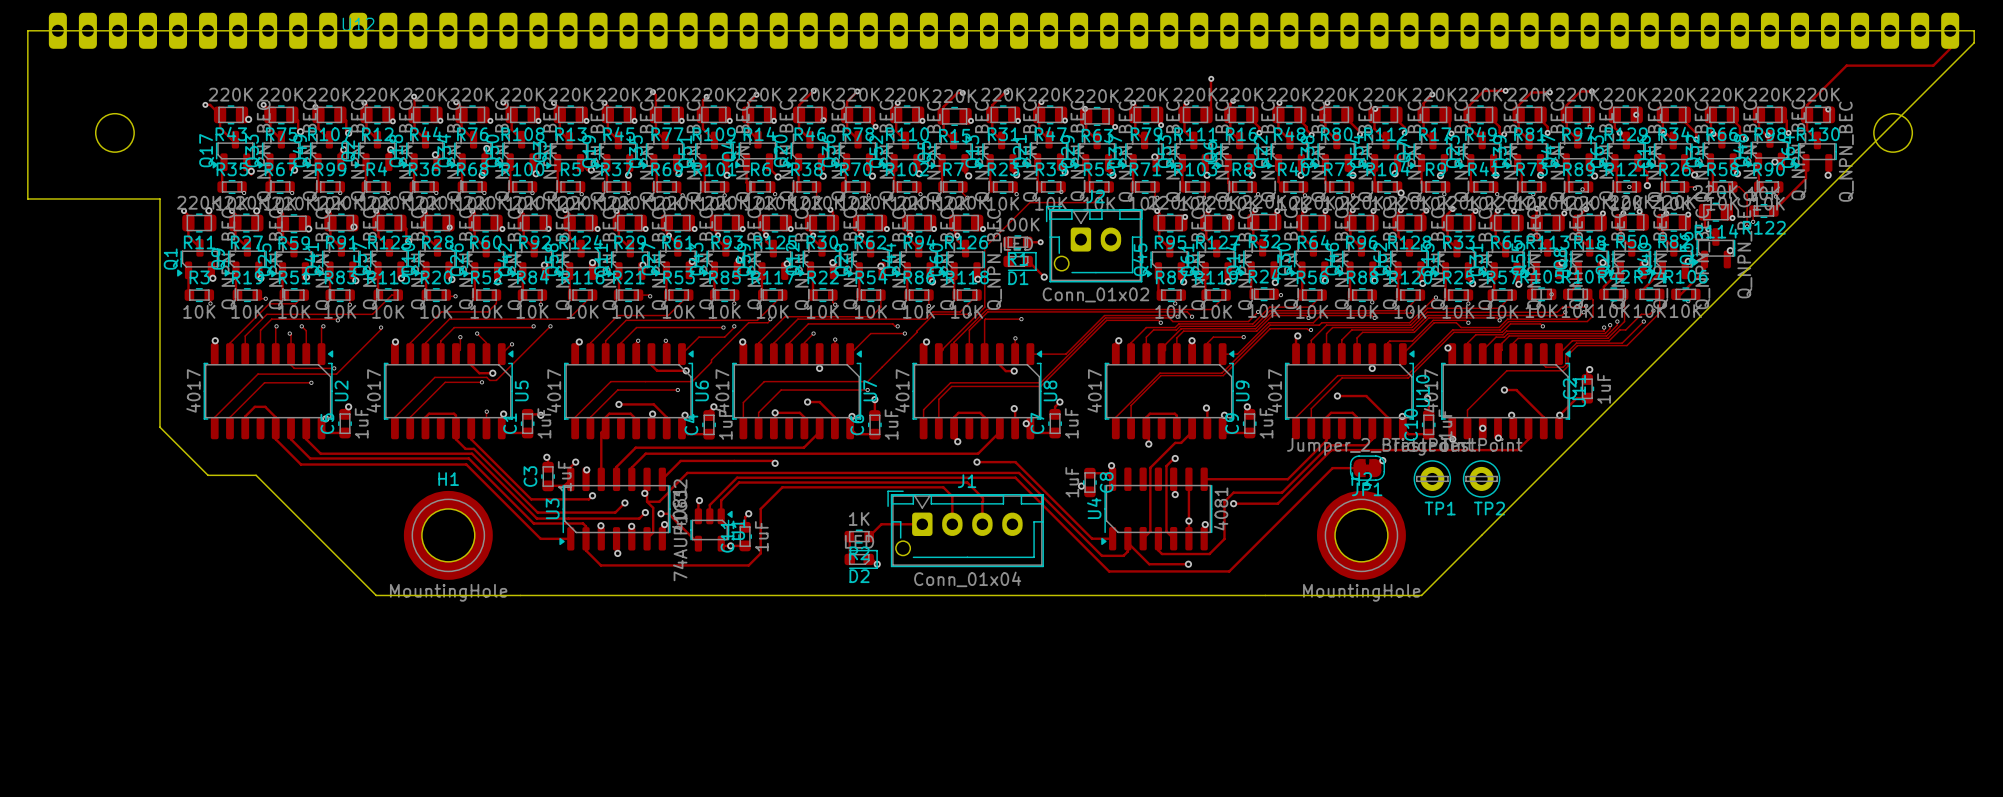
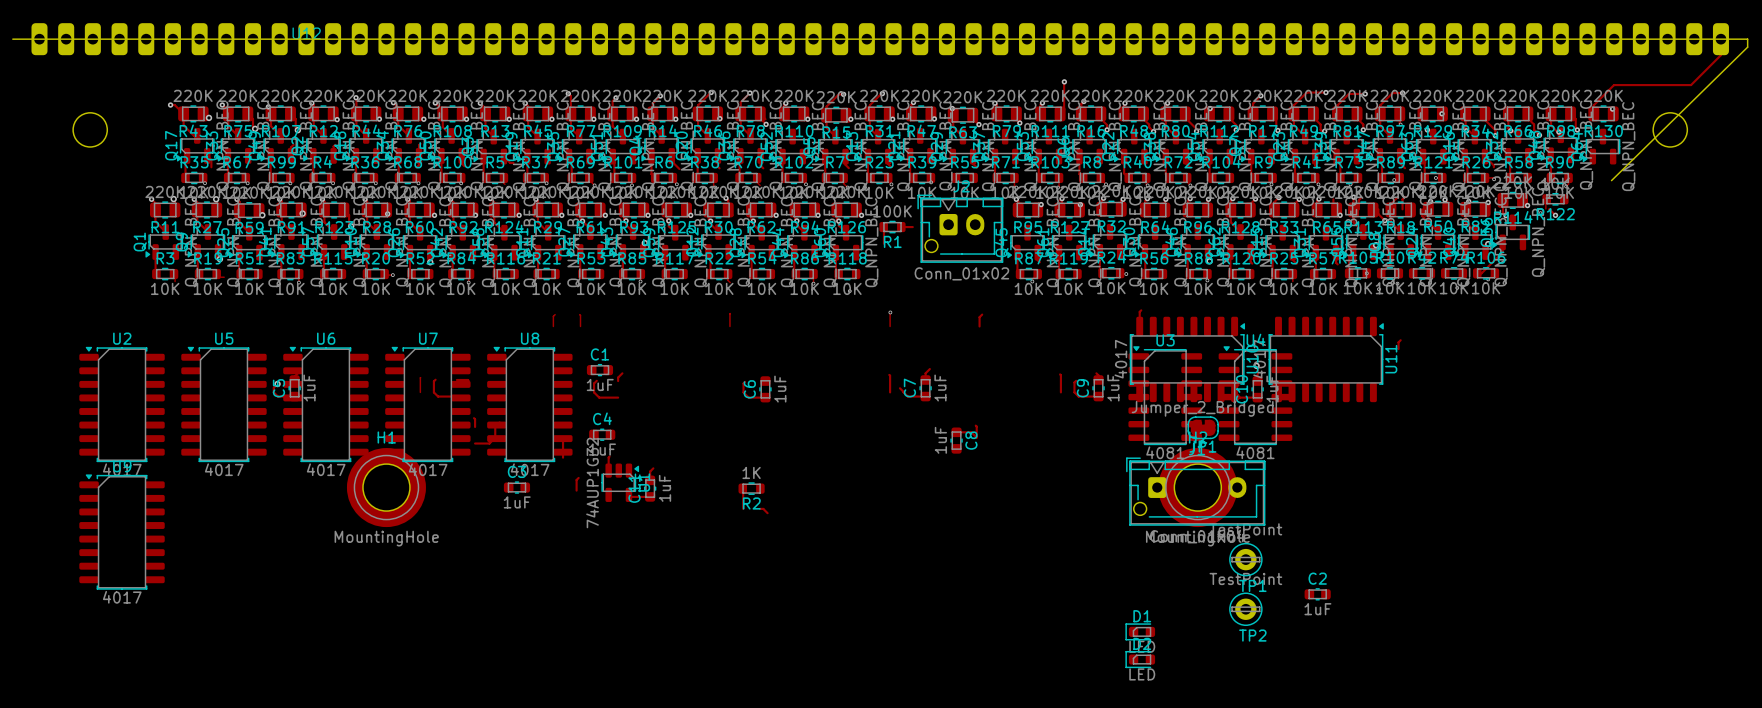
board edge: (27, 30) (27, 198) (159, 198) (159, 427) (208, 475) (256, 475) (376, 595) (1421, 595) (1974, 42) (1974, 30) -> (1611, 180) (1747, 47) (1747, 39) (1742, 39)
track: (1933, 65) (1846, 65) (1829, 82) -> (1706, 70) (1691, 85) (1614, 85)
track: (896, 114) (896, 131) (905, 140) -> none
track: (1039, 114) (1039, 129) (1049, 139) -> none
track: (1135, 114) (1135, 131) (1144, 140) -> none
track: (1184, 114) (1184, 131) (1193, 140) -> none
track: (1230, 114) (1230, 131) (1239, 140) -> none
track: (1278, 114) (1278, 128) (1289, 140) -> none
track: (1374, 114) (1374, 128) (1386, 140) -> none
track: (1423, 114) (1423, 131) (1432, 140) -> none
track: (1518, 114) (1518, 130) (1529, 140) -> none
track: (1614, 114) (1614, 127) (1619, 132) -> none
track: (1807, 114) (1807, 130) (1817, 140) -> none
via: (486, 148) -> none
via: (343, 149) -> none
via: (390, 149) -> none
via: (435, 154) -> none
via: (1154, 156) -> none
via: (1774, 161) -> none
track: (1085, 162) (1089, 166) (1089, 186) -> none
track: (1637, 162) (1647, 172) (1647, 185) -> none
track: (1805, 162) (1805, 178) (1773, 211) -> none
via: (294, 170) -> none
via: (591, 170) -> none
via: (251, 171) -> none
via: (1065, 172) -> none
via: (536, 173) -> none
via: (679, 173) -> none
via: (919, 173) -> none
via: (1395, 173) -> none
via: (1737, 173) -> none
via: (1016, 174) -> none
via: (1694, 174) -> none
via: (482, 175) -> none
via: (628, 175) -> none
via: (727, 175) -> none
via: (968, 175) -> none
via: (1112, 175) -> none
via: (1207, 175) -> none
via: (1252, 175) -> none
via: (1301, 175) -> none
via: (1352, 175) -> none
via: (1440, 175) -> none
via: (1495, 175) -> none
via: (1540, 175) -> none
via: (1828, 175) -> none
via: (778, 176) -> none
via: (823, 176) -> none
via: (872, 176) -> none
via: (1594, 176) -> none
via: (1647, 185) -> none
track: (1109, 186) (1093, 202) (1029, 202) (984, 247) (984, 307) (938, 354) -> none
track: (1732, 186) (1739, 186) (1747, 194) (1747, 226) -> none
via: (1401, 192) -> none
via: (581, 194) -> none
via: (868, 195) -> none
track: none -> (1405, 196) (1402, 199) (1402, 209)
track: none -> (1360, 198) (1358, 200) (1358, 209)
via: (1586, 209) -> none
via position: (1514, 211) -> (1340, 215)
via: (1564, 213) -> none
via: (1602, 213) -> none
via: (1753, 221) -> none
track: (1253, 222) (1253, 238) (1262, 247) -> none
track: none -> (1378, 209) (1378, 214) (1384, 220)
track: none -> (1422, 209) (1422, 215) (1426, 220)
track: none -> (1549, 209) (1555, 215)
track: (1159, 223) (1159, 238) (1169, 248) -> none
track: (1206, 223) (1206, 238) (1216, 248) -> none
track: (1302, 223) (1302, 236) (1313, 247) -> none
track: (1350, 223) (1350, 236) (1361, 247) -> none
track: (1447, 223) (1447, 239) (1456, 248) -> none
track: (1495, 223) (1495, 238) (1505, 248) -> none
via: none -> (1555, 215)
via: none -> (1384, 220)
via: (1040, 242) -> none
via: (1730, 250) -> none
via: (692, 261) -> none
D1 rotation: 0° (1020, 261) -> 180° (1140, 631)
D1 position: (1020, 261) -> (1140, 631)
track: (1027, 261) (1044, 277) -> none
via: (592, 262) -> none
via: (832, 262) -> none
via: (1602, 262) -> none
via: (1644, 262) -> none
via: (787, 263) -> none
via: (544, 265) -> none
via: (642, 265) -> none
via: (880, 266) -> none
track: (1620, 270) (1603, 286) (1603, 294) -> none
track: (1662, 270) (1639, 294) -> none
via: (306, 277) -> none
via: (1044, 277) -> none
via: (212, 278) -> none
via: (401, 278) -> none
via: (451, 279) -> none
via: (977, 279) -> none
via: (355, 280) -> none
via: (1325, 280) -> none
via: (932, 281) -> none
via: (1183, 281) -> none
via: (1228, 281) -> none
via: (1275, 282) -> none
via: (1422, 283) -> none
via: (1472, 283) -> none
via: (1518, 284) -> none
track: (1587, 294) (1593, 299) (1593, 315) (1587, 321) (1508, 321) (1500, 329) (1452, 329) (1407, 375) (1337, 375) (1296, 417) (1296, 428) -> none
track: (1623, 294) (1624, 321) (1607, 338) (1518, 338) (1513, 343) (1513, 354) -> none
track: (1659, 294) (1659, 312) (1626, 345) (1577, 345) (1568, 354) (1568, 365) (1563, 370) (1506, 370) (1467, 410) (1467, 428) -> none
track: (304, 295) (295, 303) (269, 303) (229, 343) (229, 354) -> none
track: (398, 295) (391, 295) (372, 314) (266, 314) (245, 336) (245, 354) -> none
track: (496, 295) (496, 303) (487, 311) (441, 311) (410, 343) (410, 354) -> none
track: (592, 295) (568, 319) (449, 319) (425, 343) (425, 354) -> none
track: (638, 295) (650, 296) -> none
track: (688, 295) (668, 315) (618, 315) (590, 343) (590, 354) -> none
track: (782, 295) (757, 320) (626, 320) (605, 340) (605, 354) -> none
track: (880, 295) (880, 307) (871, 316) (785, 316) (758, 343) (758, 354) -> none
track: (976, 295) (960, 311) (932, 311) (925, 319) (797, 319) (773, 343) (773, 354) -> none
track: (1225, 295) (1211, 309) (986, 309) (954, 342) (954, 354) -> none
track: (1322, 295) (1310, 307) (1269, 307) (1252, 323) (1178, 323) (1175, 327) (1146, 327) (1131, 342) (1131, 354) -> none
track: (1420, 295) (1404, 310) (1270, 310) (1254, 326) (1180, 326) (1176, 329) (1153, 329) (1146, 337) (1146, 354) -> none
track: (1512, 295) (1499, 308) (1427, 308) (1410, 325) (1326, 325) (1311, 340) (1311, 354) -> none
via: (650, 296) -> none
track: (1435, 297) (1409, 322) (1321, 322) (1319, 325) (1269, 325) (1221, 373) (1159, 373) (1115, 417) (1115, 428) -> none
via: (1435, 297) -> none
via: (265, 298) -> none
via: (210, 303) -> none
via: (1468, 303) -> none
via: (835, 304) -> none
track: (1586, 305) (1562, 307) (1557, 312) (1427, 312) (1411, 327) (1332, 327) (1326, 333) (1326, 354) -> none
track: (1653, 310) (1649, 314) (1641, 314) (1625, 329) (1619, 329) (1609, 340) (1572, 340) (1559, 354) -> none
track: (1258, 311) (1248, 321) (1172, 321) (1169, 317) (1105, 317) (1040, 382) (950, 382) (923, 409) (923, 428) -> none
via: (1258, 311) -> none
track: (1412, 311) (1410, 313) (1271, 313) (1255, 328) (1181, 328) (1165, 344) (1165, 350) (1161, 354) -> none
via: (1412, 311) -> none
track: (1565, 312) (1562, 315) (1427, 315) (1413, 329) (1351, 329) (1341, 339) (1341, 354) -> none
track: (1583, 312) (1576, 319) (1507, 319) (1499, 327) (1461, 327) (1456, 322) (1434, 322) (1402, 354) -> none
via: (1583, 312) -> none
track: (969, 314) (933, 314) (867, 381) (764, 381) (743, 402) (743, 428) -> none
track: (1177, 316) (1104, 315) (1065, 354) (1030, 354) -> none
via: (1177, 316) -> none
track: (1192, 316) (1187, 311) (987, 311) (969, 330) (969, 354) -> none
via: (1192, 316) -> none
track: (1308, 317) (1306, 315) (1272, 315) (1256, 331) (1183, 331) (1176, 337) (1176, 354) -> none
via: (1308, 317) -> none
track: (1374, 317) (1372, 315) (1320, 315) (1313, 322) (1268, 322) (1237, 354) (1222, 354) -> none
via: (1374, 317) -> none
track: (770, 319) (767, 322) (748, 322) (692, 381) (610, 381) (575, 417) (575, 428) -> none
via: (770, 319) -> none
track: (1021, 319) (985, 319) (984, 354) -> none
via: (1021, 319) -> none
track: (337, 320) (271, 319) (260, 330) (260, 354) -> none
via: (337, 320) -> none
track: (1499, 320) (1497, 317) (1428, 317) (1414, 332) (1362, 332) (1357, 337) (1357, 354) -> none
via: (1499, 320) -> none
track: (1617, 321) (1617, 325) (1606, 335) (1509, 335) (1502, 343) (1502, 350) (1498, 354) -> none
via: (1617, 321) -> none
track: (1643, 321) (1622, 343) (1576, 343) (1565, 353) (1565, 364) (1563, 367) (1545, 367) (1543, 365) (1543, 354) -> none
via: (1643, 321) -> none
track: (1160, 322) (1158, 320) (1106, 320) (1040, 386) (951, 386) (938, 399) (938, 428) -> none
via: (1160, 322) -> none
track: (1468, 322) (1465, 320) (1433, 320) (1412, 341) (1389, 341) (1387, 343) (1387, 354) -> none
via: (1468, 322) -> none
track: (1610, 325) (1610, 328) (1605, 333) -> none
via: (1610, 325) -> none
track: (276, 326) (275, 354) -> none
via: (276, 326) -> none
track: (301, 326) (306, 330) (306, 354) -> none
via: (301, 326) -> none
track: (323, 326) (321, 328) (321, 354) -> none
via: (323, 326) -> none
track: (533, 326) (454, 327) (440, 341) (440, 354) -> none
via: (533, 326) -> none
track: (550, 326) (496, 380) (489, 380) (486, 377) (434, 377) (394, 417) (394, 428) -> none
via: (550, 326) -> none
track: (734, 326) (724, 337) (698, 337) (681, 354) -> none
via: (734, 326) -> none
track: (897, 326) (892, 323) (808, 323) (789, 343) (789, 354) -> none
via: (897, 326) -> none
track: (1542, 326) (1540, 323) (1510, 323) (1502, 332) (1453, 332) (1408, 378) (1342, 378) (1311, 408) (1311, 428) -> none
via: (1542, 326) -> none
track: (381, 327) (336, 374) (257, 374) (214, 417) (214, 428) -> none
via: (381, 327) -> none
track: (723, 327) (636, 327) (620, 343) (620, 354) -> none
via: (723, 327) -> none
track: (1604, 327) (1604, 331) (1506, 331) (1503, 334) (1475, 334) (1467, 343) (1467, 354) -> none
via: (1604, 327) -> none
track: (1310, 329) (1270, 328) (1223, 375) (1160, 375) (1131, 405) (1131, 428) -> none
via: (1310, 329) -> none
track: (289, 333) (291, 365) (294, 368) (334, 368) -> none
via: (289, 333) -> none
track: (477, 333) (486, 342) (486, 354) -> none
via: (477, 333) -> none
track: (813, 333) (804, 342) (804, 354) -> none
via: (813, 333) -> none
track: (904, 333) (870, 333) (850, 354) -> none
via: (904, 333) -> none
track: (1605, 333) (1508, 333) (1504, 337) (1496, 337) (1482, 350) (1482, 354) -> none
via: (1297, 335) -> none
track: (460, 337) (460, 349) (455, 354) -> none
via: (460, 337) -> none
track: (1243, 337) (1213, 337) (1207, 343) (1207, 354) -> none
via: (1243, 337) -> none
via: (835, 339) -> none
via: (215, 340) -> none
via: (638, 340) -> none
via: (665, 340) -> none
via: (1118, 340) -> none
via: (1192, 340) -> none
via: (395, 341) -> none
via: (579, 341) -> none
via: (742, 341) -> none
via: (926, 341) -> none
track: (512, 344) (501, 354) -> none
via: (512, 344) -> none
via: (1447, 347) -> none
track: (471, 354) (471, 365) (479, 373) (492, 373) -> none
track: (651, 354) (651, 365) (657, 370) (686, 370) -> none
track: (999, 354) (999, 365) (1005, 371) (1014, 371) -> none
via: (334, 368) -> none
via: (819, 368) -> none
via: (1372, 368) -> none
via: (1589, 369) -> none
via: (686, 370) -> none
via: (1014, 371) -> none
via: (492, 373) -> none
track: (311, 382) (264, 382) (229, 417) (229, 428) -> none
via: (311, 382) -> none
track: (481, 382) (445, 382) (410, 417) (410, 428) -> none
via: (481, 382) -> none
C2 rotation: 0° (1587, 388) -> 90° clockwise (1317, 594)
C2 position: (1587, 388) -> (1317, 594)
track: (677, 390) (617, 390) (590, 417) (590, 428) -> none
via: (677, 390) -> none
track: (867, 390) (781, 390) (758, 412) (758, 428) -> none
via: (867, 390) -> none
track: (1504, 390) (1516, 390) (1543, 417) (1543, 428) -> none
via: (1504, 390) -> none
U2 rotation: 0° (268, 391) -> 90° counterclockwise (122, 404)
U2 position: (268, 391) -> (122, 404)
U5 rotation: 0° (448, 391) -> 90° counterclockwise (223, 404)
U5 position: (448, 391) -> (223, 404)
U6 rotation: 0° (628, 391) -> 90° counterclockwise (325, 404)
U6 position: (628, 391) -> (325, 404)
U7 rotation: 0° (797, 391) -> 90° counterclockwise (427, 404)
U7 position: (797, 391) -> (427, 404)
U8 rotation: 0° (977, 391) -> 90° counterclockwise (529, 404)
U8 position: (977, 391) -> (529, 404)
U9 rotation: 0° (1169, 391) -> 90° counterclockwise (122, 532)
U9 position: (1169, 391) -> (122, 532)
track: (1337, 396) (1366, 396) (1387, 417) (1387, 428) -> none
via: (1337, 396) -> none
track: (1587, 398) (1576, 398) (1559, 415) (1559, 428) -> none
track: (874, 399) (874, 415) -> none
via: (874, 399) -> none
track: (807, 402) (819, 402) (834, 417) (834, 428) -> none
via: (807, 402) -> none
via: (1059, 402) -> none
track: (618, 404) (653, 404) (666, 417) (666, 428) -> none
via: (618, 404) -> none
via: (348, 406) -> none
via: (713, 406) -> none
via: (1247, 406) -> none
via: (1014, 408) -> none
via: (1206, 408) -> none
via: (486, 411) -> none
via: (775, 412) -> none
via: (503, 414) -> none
via: (652, 414) -> none
via: (540, 415) -> none
via: (685, 415) -> none
via: (1224, 415) -> none
via: (1511, 415) -> none
via: (1559, 415) -> none
via: (852, 416) -> none
via: (1402, 416) -> none
C1 rotation: 0° (527, 423) -> 90° clockwise (599, 370)
C1 position: (527, 423) -> (599, 370)
via: (1026, 423) -> none
C4 rotation: 0° (709, 424) -> 90° clockwise (602, 434)
C4 position: (709, 424) -> (602, 434)
track: (245, 428) (245, 416) (254, 406) (265, 406) (275, 417) (275, 439) (300, 464) (466, 464) (540, 538) (570, 538) -> none
track: (291, 428) (291, 439) (310, 458) (468, 458) (533, 523) (583, 523) (586, 526) (586, 550) (600, 565) (748, 565) (760, 553) (760, 508) (782, 487) (943, 487) (952, 496) (952, 524) -> none
track: (306, 428) (306, 439) (320, 453) (472, 453) (536, 518) (639, 518) (645, 512) -> none
track: (425, 428) (425, 417) (429, 413) (454, 413) (455, 415) (455, 439) (465, 448) (473, 448) (537, 512) (615, 512) (624, 502) -> none
track: (471, 428) (471, 439) (531, 499) (588, 499) (592, 495) -> none
track: (636, 428) (636, 419) (630, 413) (609, 413) (605, 417) (605, 428) (601, 432) (601, 479) -> none
track: (773, 428) (775, 412) (799, 412) (804, 417) (804, 428) -> none
track: (819, 428) (819, 431) (803, 447) (635, 447) (616, 466) (616, 479) -> none
track: (984, 428) (984, 417) (980, 412) (958, 412) (954, 417) (954, 438) (957, 441) -> none
track: (999, 428) (999, 431) (978, 453) (645, 453) (631, 467) (631, 479) -> none
track: (1176, 428) (1176, 415) (1174, 413) (1149, 413) (1146, 417) (1148, 444) -> none
track: (1192, 428) (1192, 431) (1181, 442) (1175, 442) (1150, 467) (1150, 531) (1143, 538) -> none
track: (1357, 428) (1357, 417) (1352, 412) (1331, 412) (1326, 417) (1326, 440) (1287, 479) (1204, 479) -> none
track: (1372, 428) (1372, 439) (1366, 445) (1329, 445) (1282, 492) (1233, 492) (1224, 501) (1224, 539) (1209, 554) (1162, 554) (1158, 550) (1158, 538) -> none
via: (1482, 428) -> none
track: (1528, 428) (1528, 439) (1517, 450) (1331, 450) (1277, 503) (1233, 503) -> none
via: (1498, 438) -> none
via: (1452, 439) -> none
via: (957, 441) -> none
via: (1148, 444) -> none
via: (546, 457) -> none
track: (1175, 458) (1166, 466) (1166, 531) (1173, 538) -> none
via: (1175, 458) -> none
via: (1382, 460) -> none
via: (575, 462) -> none
track: (976, 462) (1015, 462) (1092, 538) (1112, 538) -> none
via: (976, 462) -> none
track: (775, 463) (772, 460) (680, 460) (662, 479) -> none
via: (775, 463) -> none
via: (1111, 465) -> none
track: (1359, 468) (1332, 468) (1229, 571) (1109, 571) (1015, 477) (737, 477) (709, 505) (709, 516) -> none
via: (586, 469) -> none
C3 rotation: 0° (548, 476) -> 90° clockwise (516, 487)
C3 position: (548, 476) -> (516, 487)
TP1 position: (1432, 478) -> (1245, 559)
TP2 position: (1481, 478) -> (1245, 609)
track: (1188, 479) (1188, 538) -> none
via: (1081, 486) -> none
via: (644, 493) -> none
via: (1175, 494) -> none
via: (592, 495) -> none
via: (699, 500) -> none
via: (624, 502) -> none
via: (1233, 503) -> none
U4 rotation: 0° (1156, 508) -> 90° clockwise (1255, 395)
U4 position: (1156, 508) -> (1255, 395)
U3 rotation: 0° (614, 509) -> 90° clockwise (1165, 395)
U3 position: (614, 509) -> (1165, 395)
via: (645, 512) -> none
track: (661, 513) (668, 513) (698, 543) -> none
via: (661, 513) -> none
via: (748, 513) -> none
track: (721, 516) (721, 500) (739, 482) (967, 482) (982, 498) (982, 524) -> none
via: (1188, 520) -> none
via: (664, 524) -> none
track: (922, 524) (881, 524) (869, 536) -> none
via: (1205, 524) -> none
via: (600, 525) -> none
via: (631, 526) -> none
J1 position: (965, 528) -> (1195, 491)
track: (647, 538) (653, 532) (653, 507) (647, 501) (659, 501) (687, 472) (1019, 472) (1101, 555) (1123, 555) (1127, 551) (1127, 538) -> none
track: (1127, 542) (1149, 564) (1188, 564) -> none
via: (730, 545) -> none
via: (617, 553) -> none
D2 rotation: 0° (861, 559) -> 180° (1140, 659)
D2 position: (861, 559) -> (1140, 659)
via: (877, 564) -> none
via: (1188, 564) -> none

